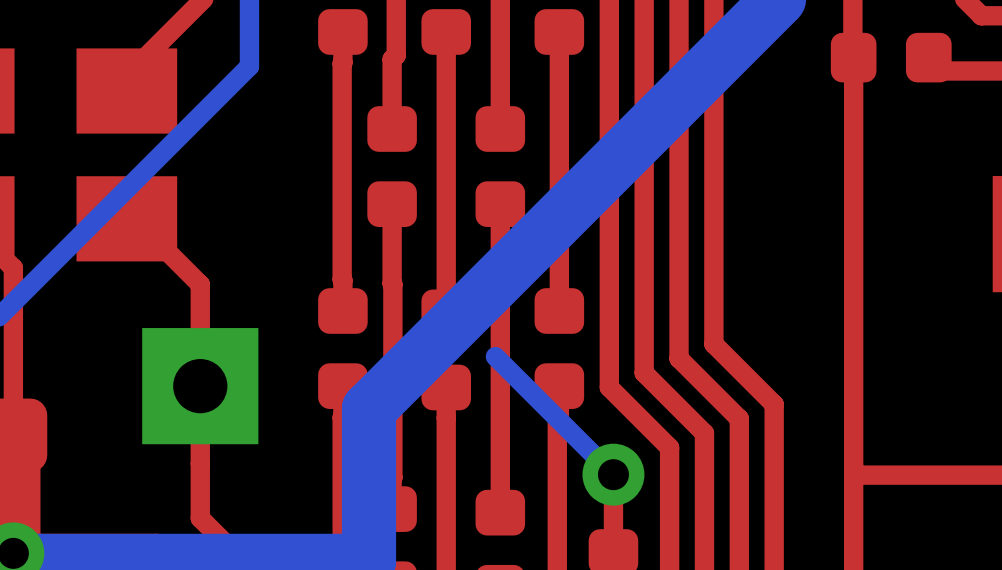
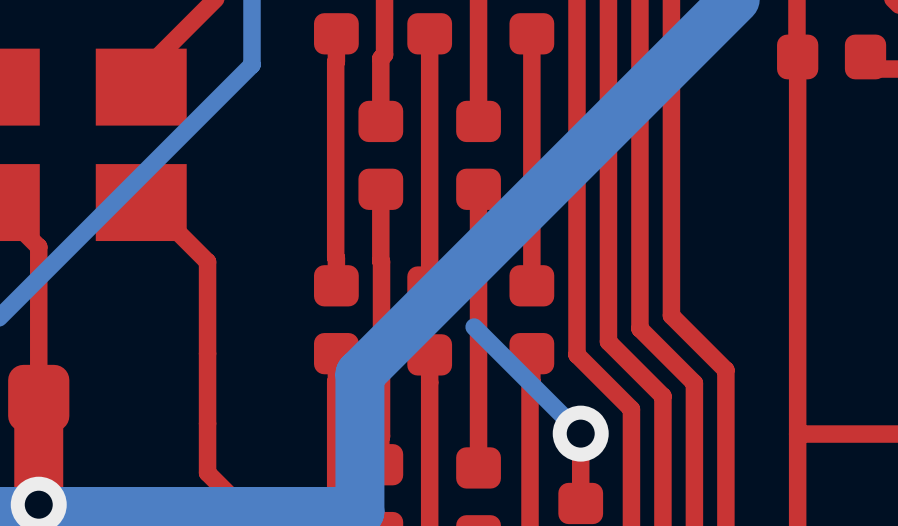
part: (200, 386) -> none

